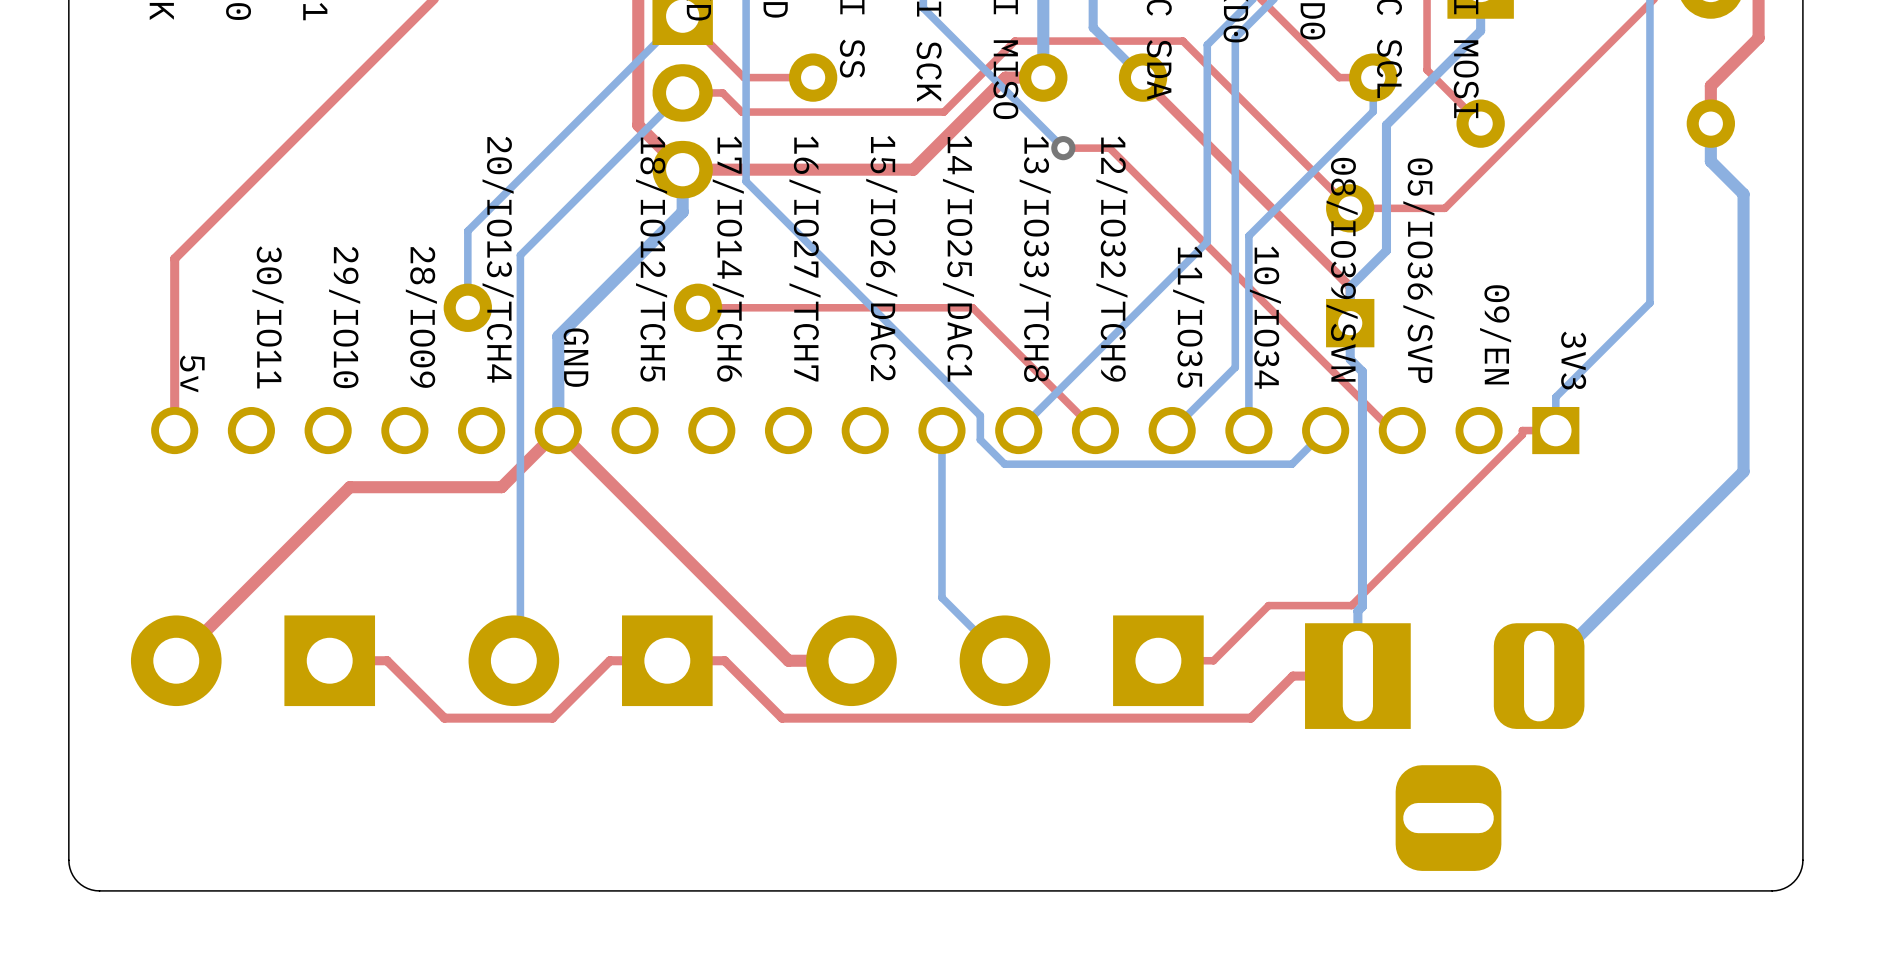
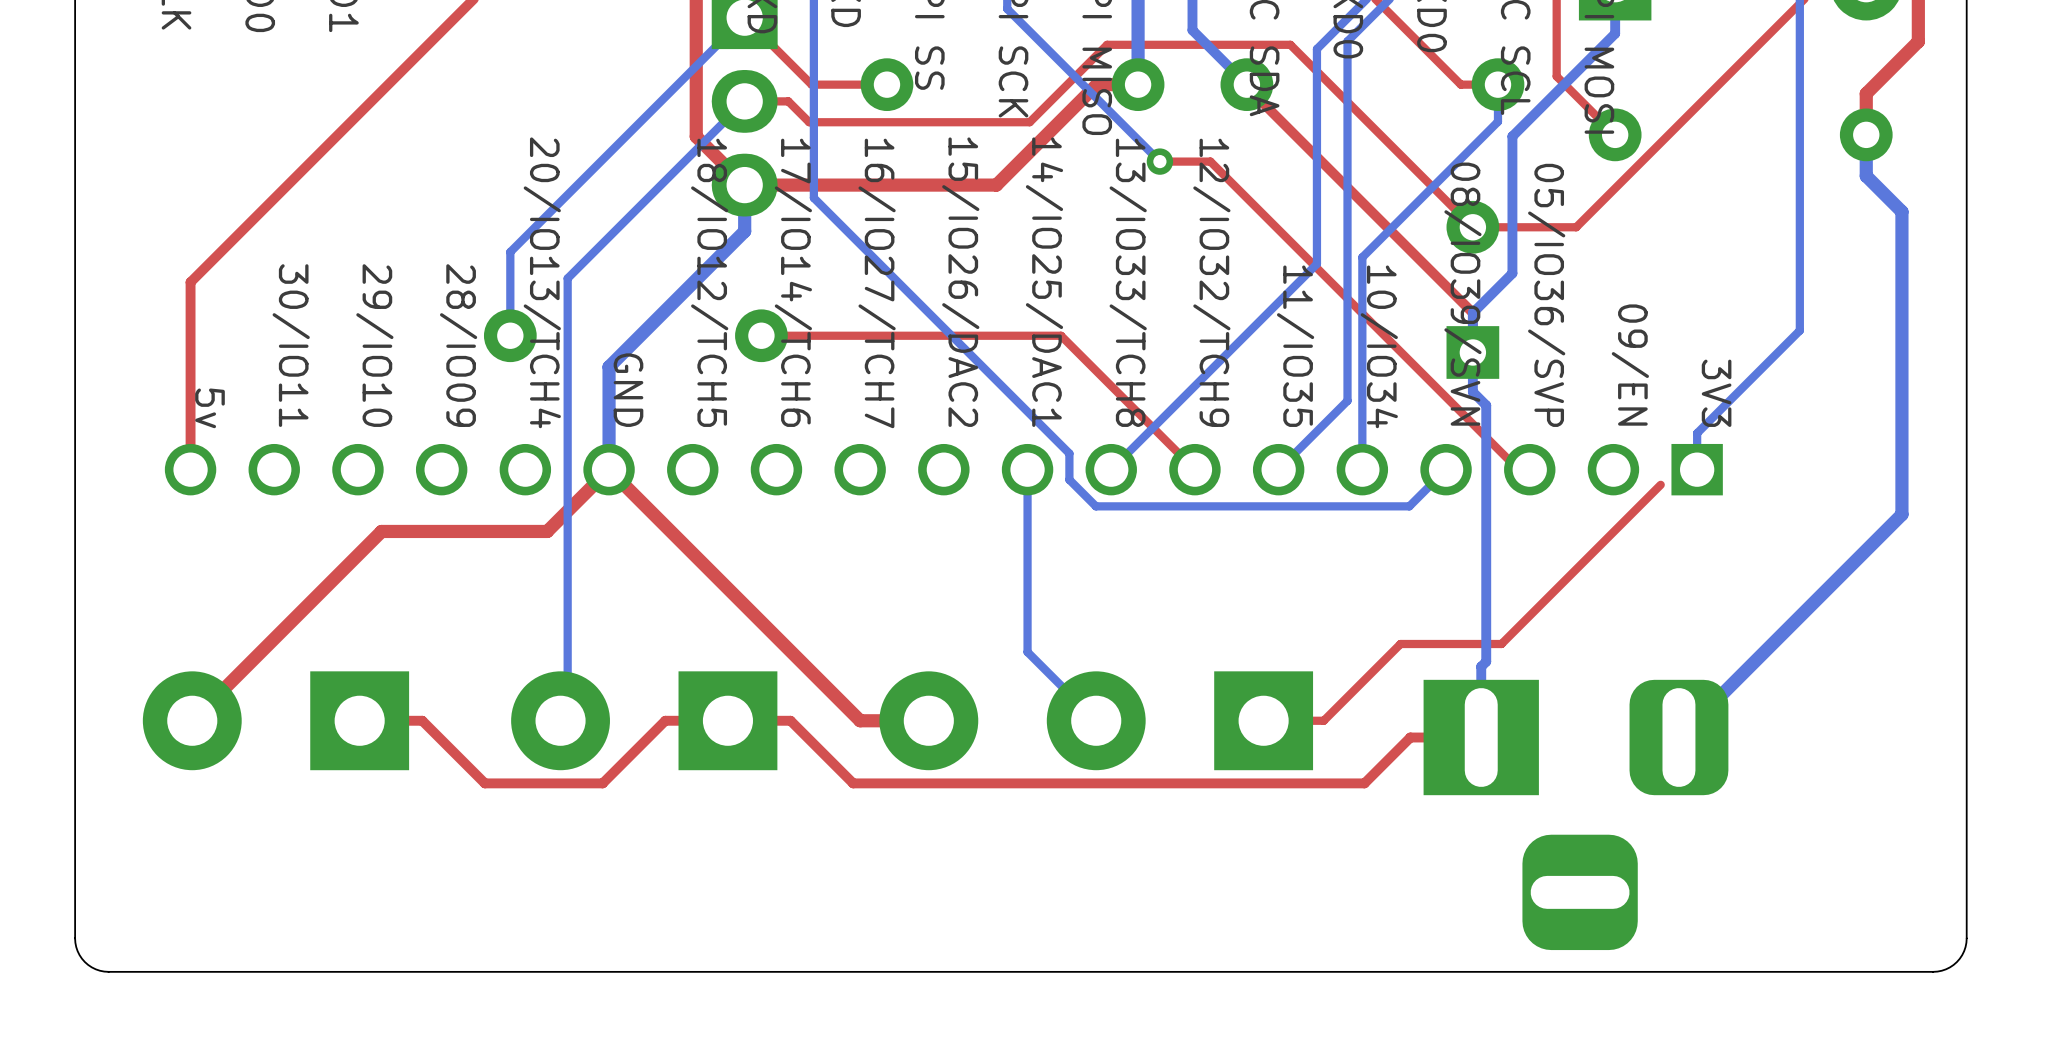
top track: (1555, 430) (1522, 430) (1522, 434) (1351, 605) (1268, 605) -> (1660, 484) (1501, 644) (1400, 644) (1383, 660)

